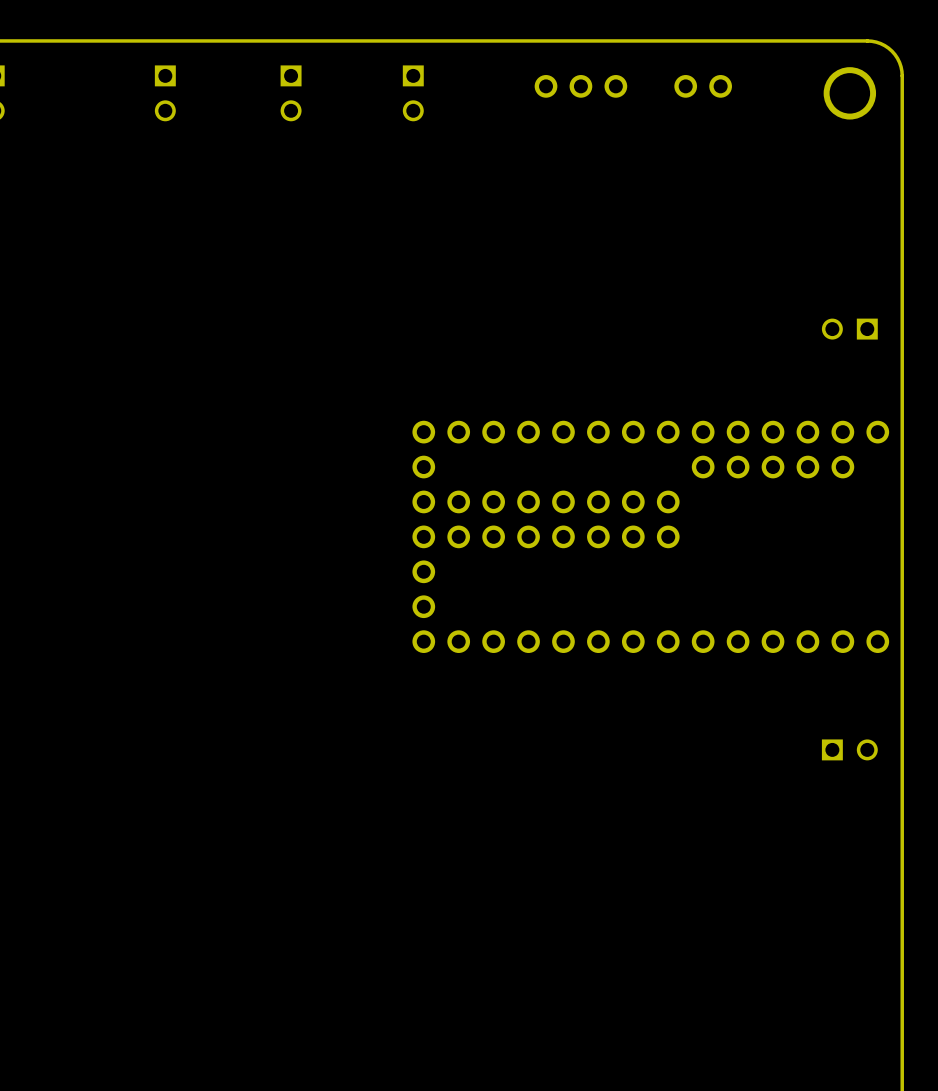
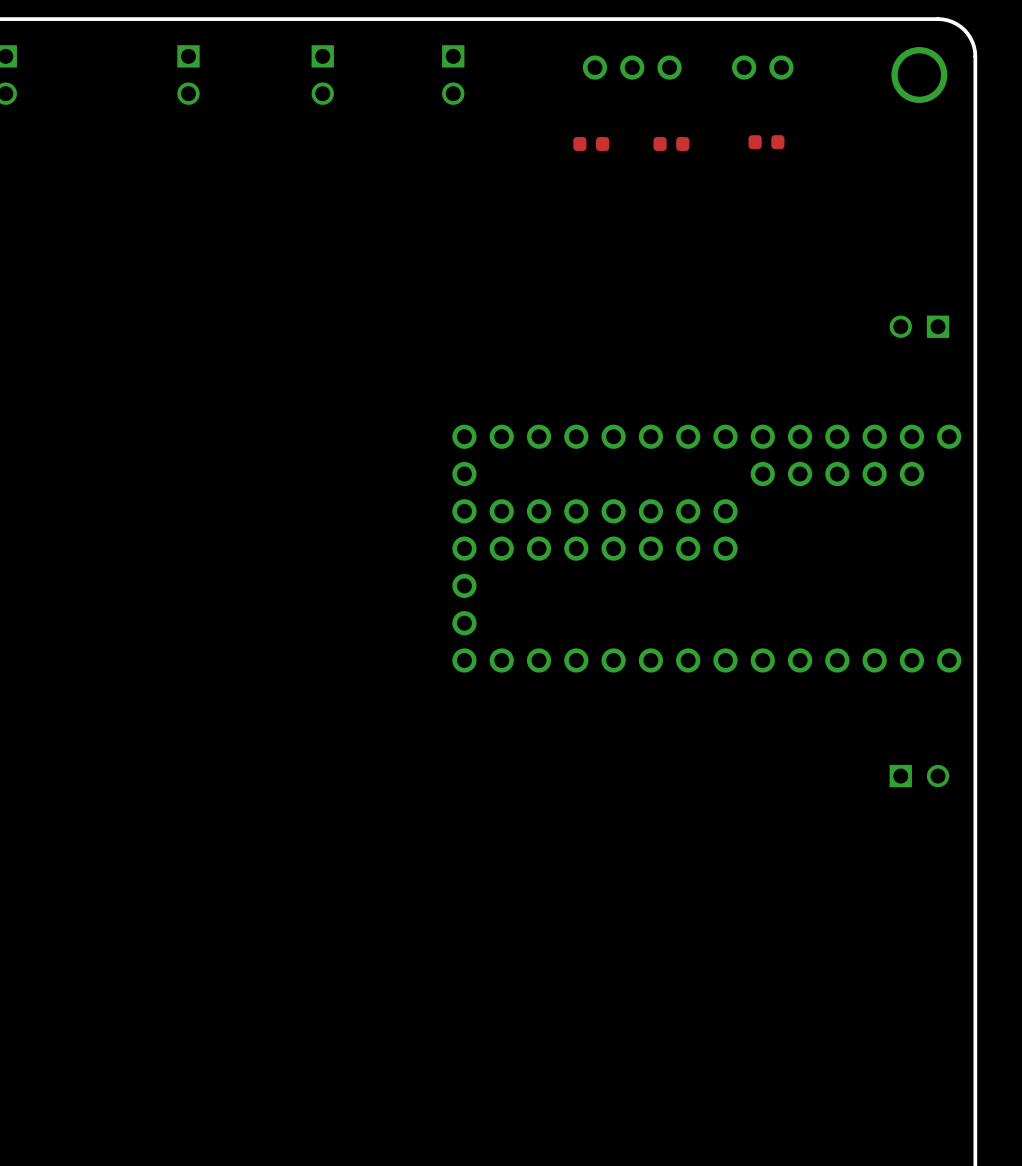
part: none -> (766, 142)
part: none -> (591, 144)
part: none -> (671, 144)

